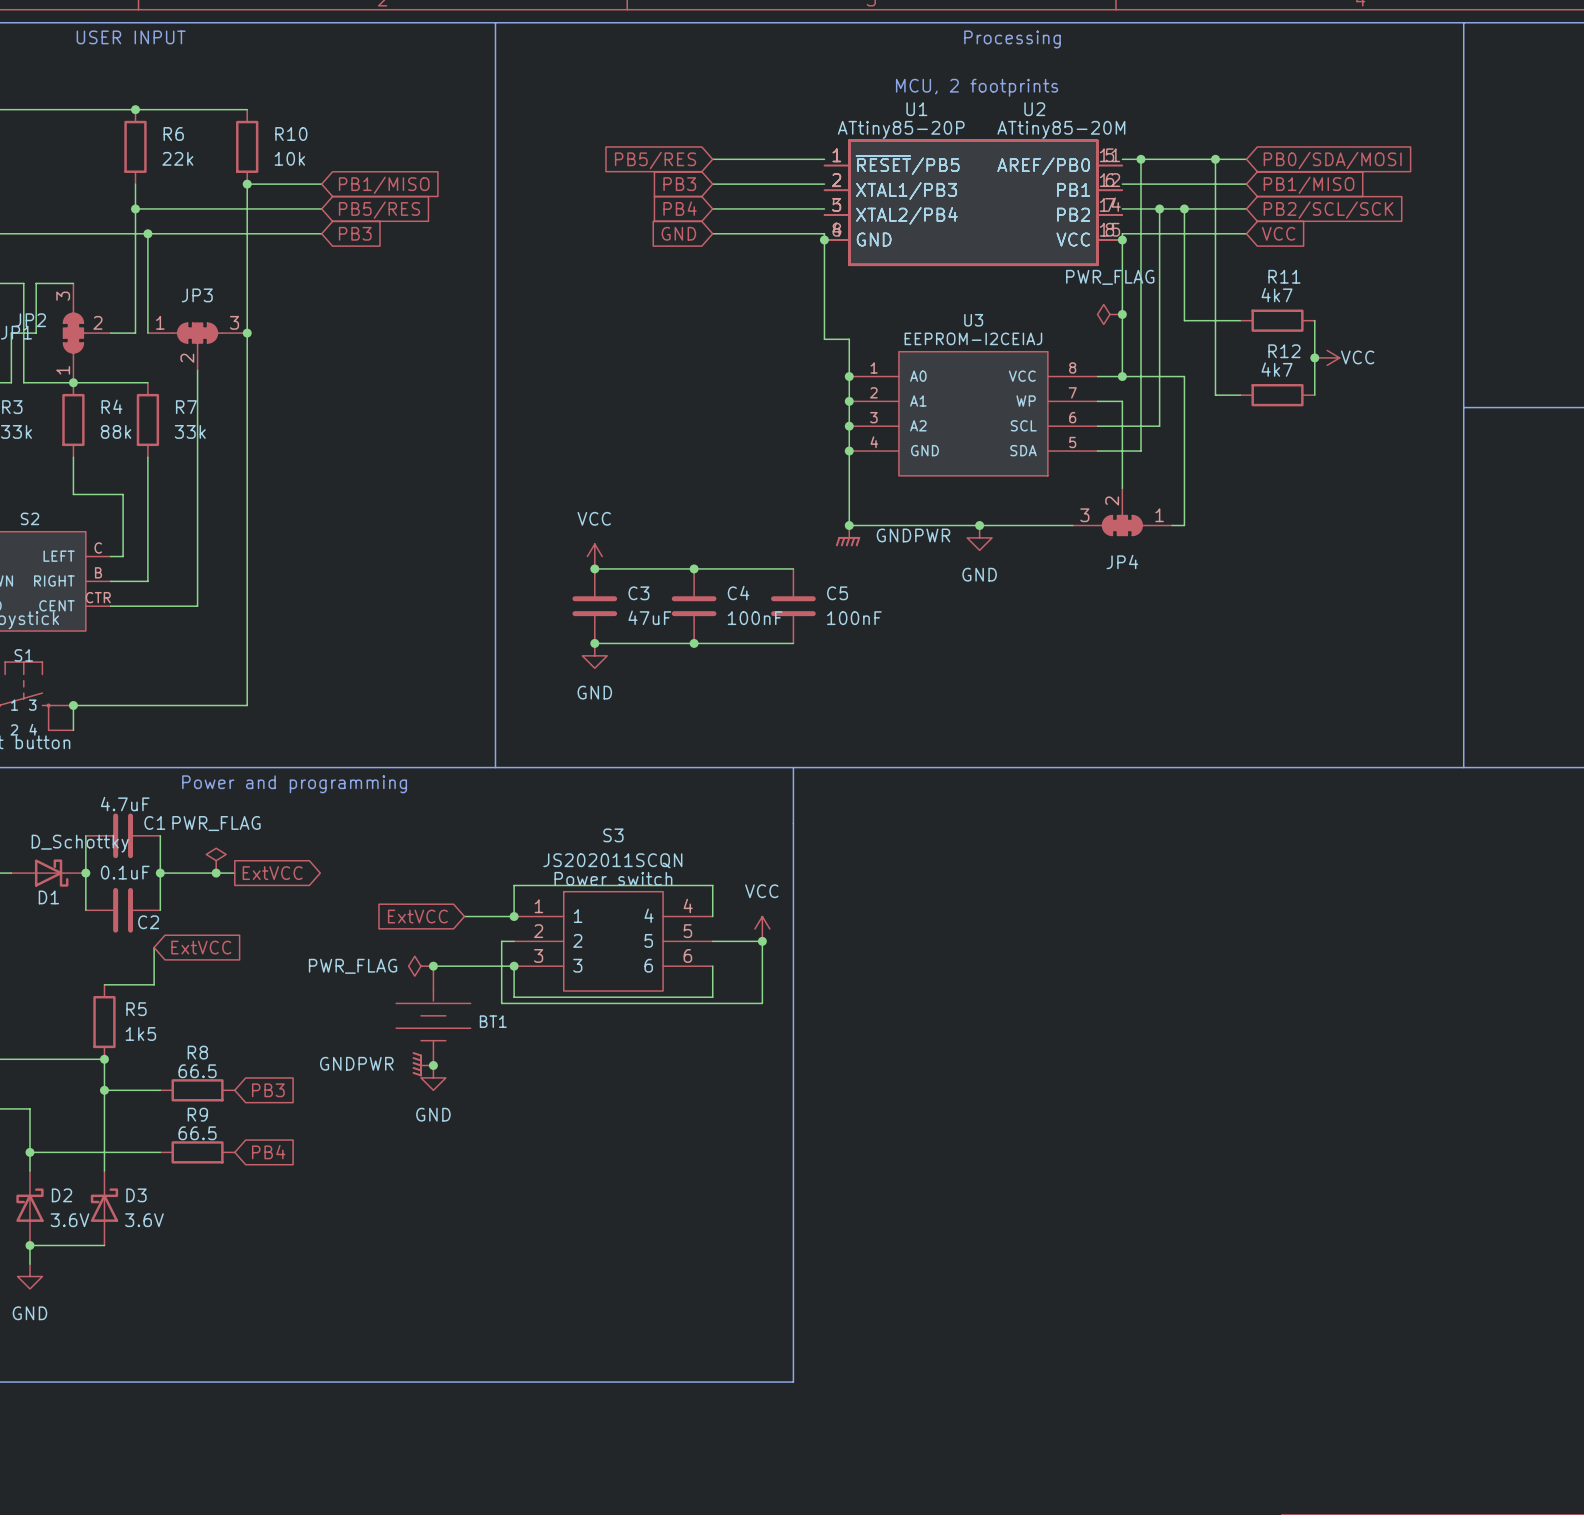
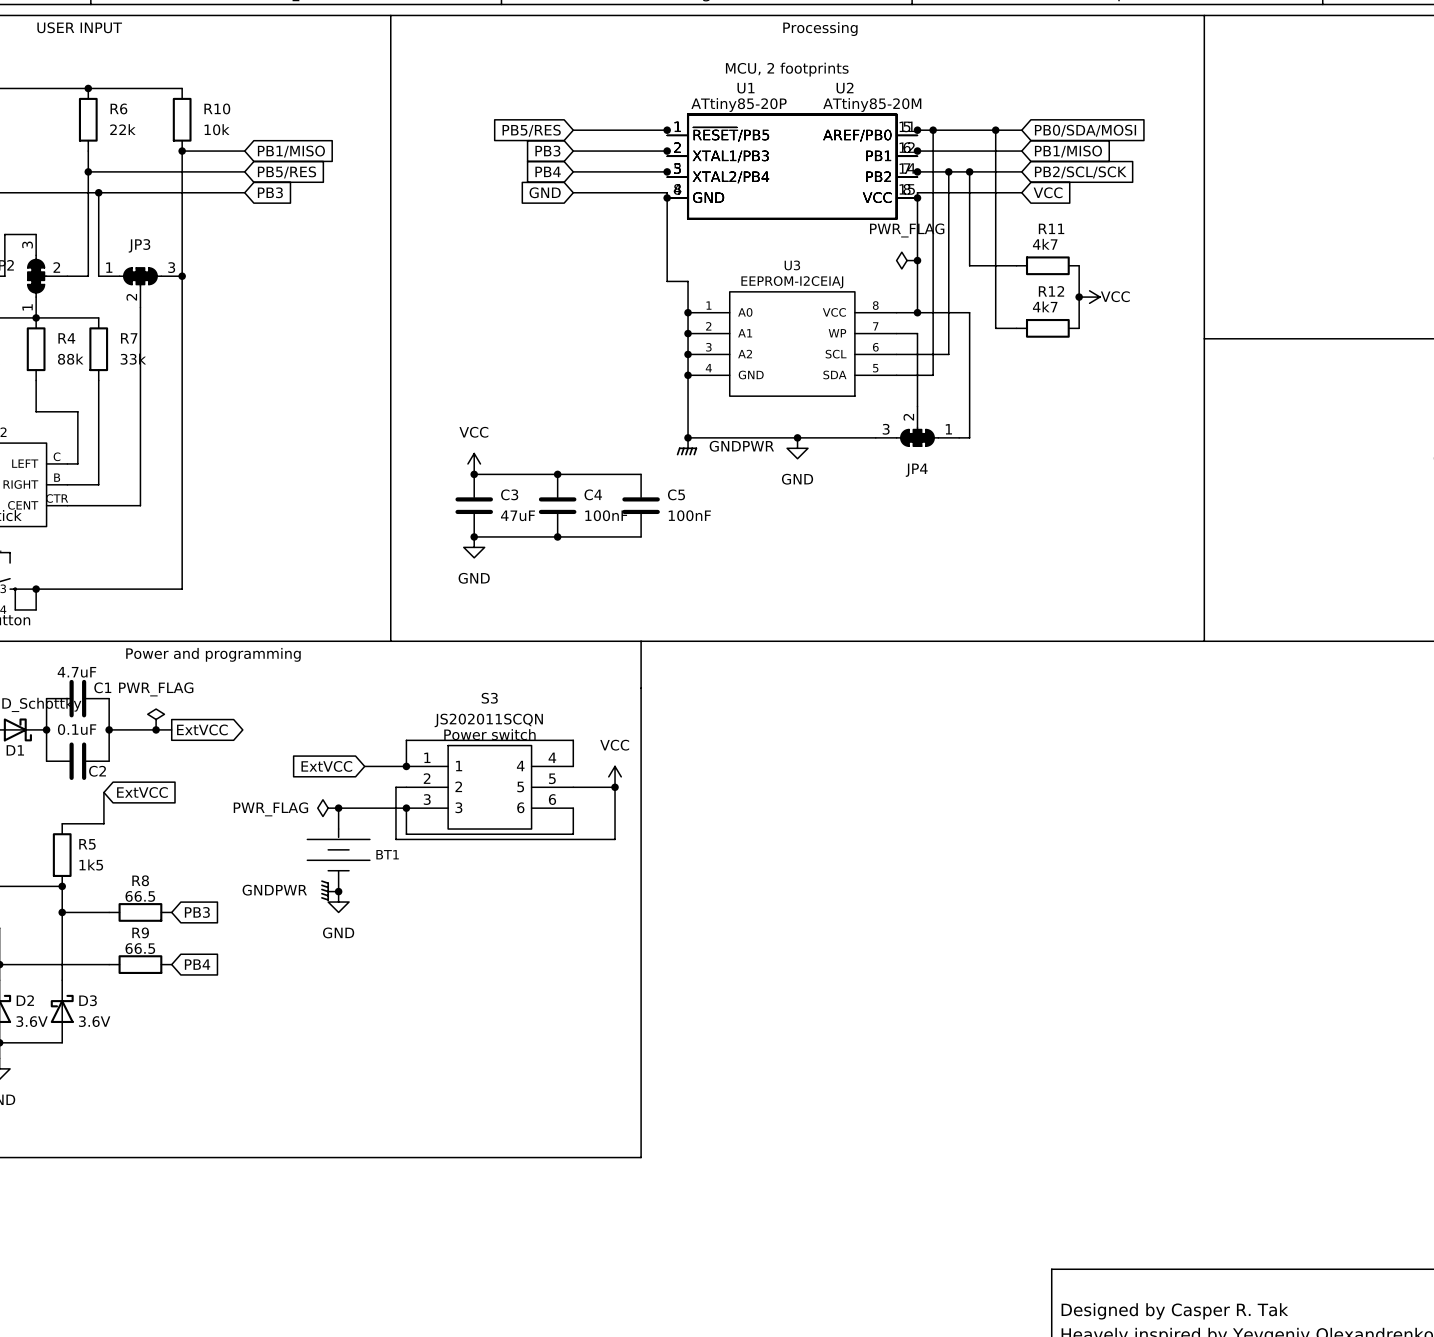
junction: none -> (667, 130)
junction: none -> (917, 130)
junction: none -> (667, 151)
junction: none -> (917, 151)
junction: none -> (667, 171)
junction: none -> (917, 171)

